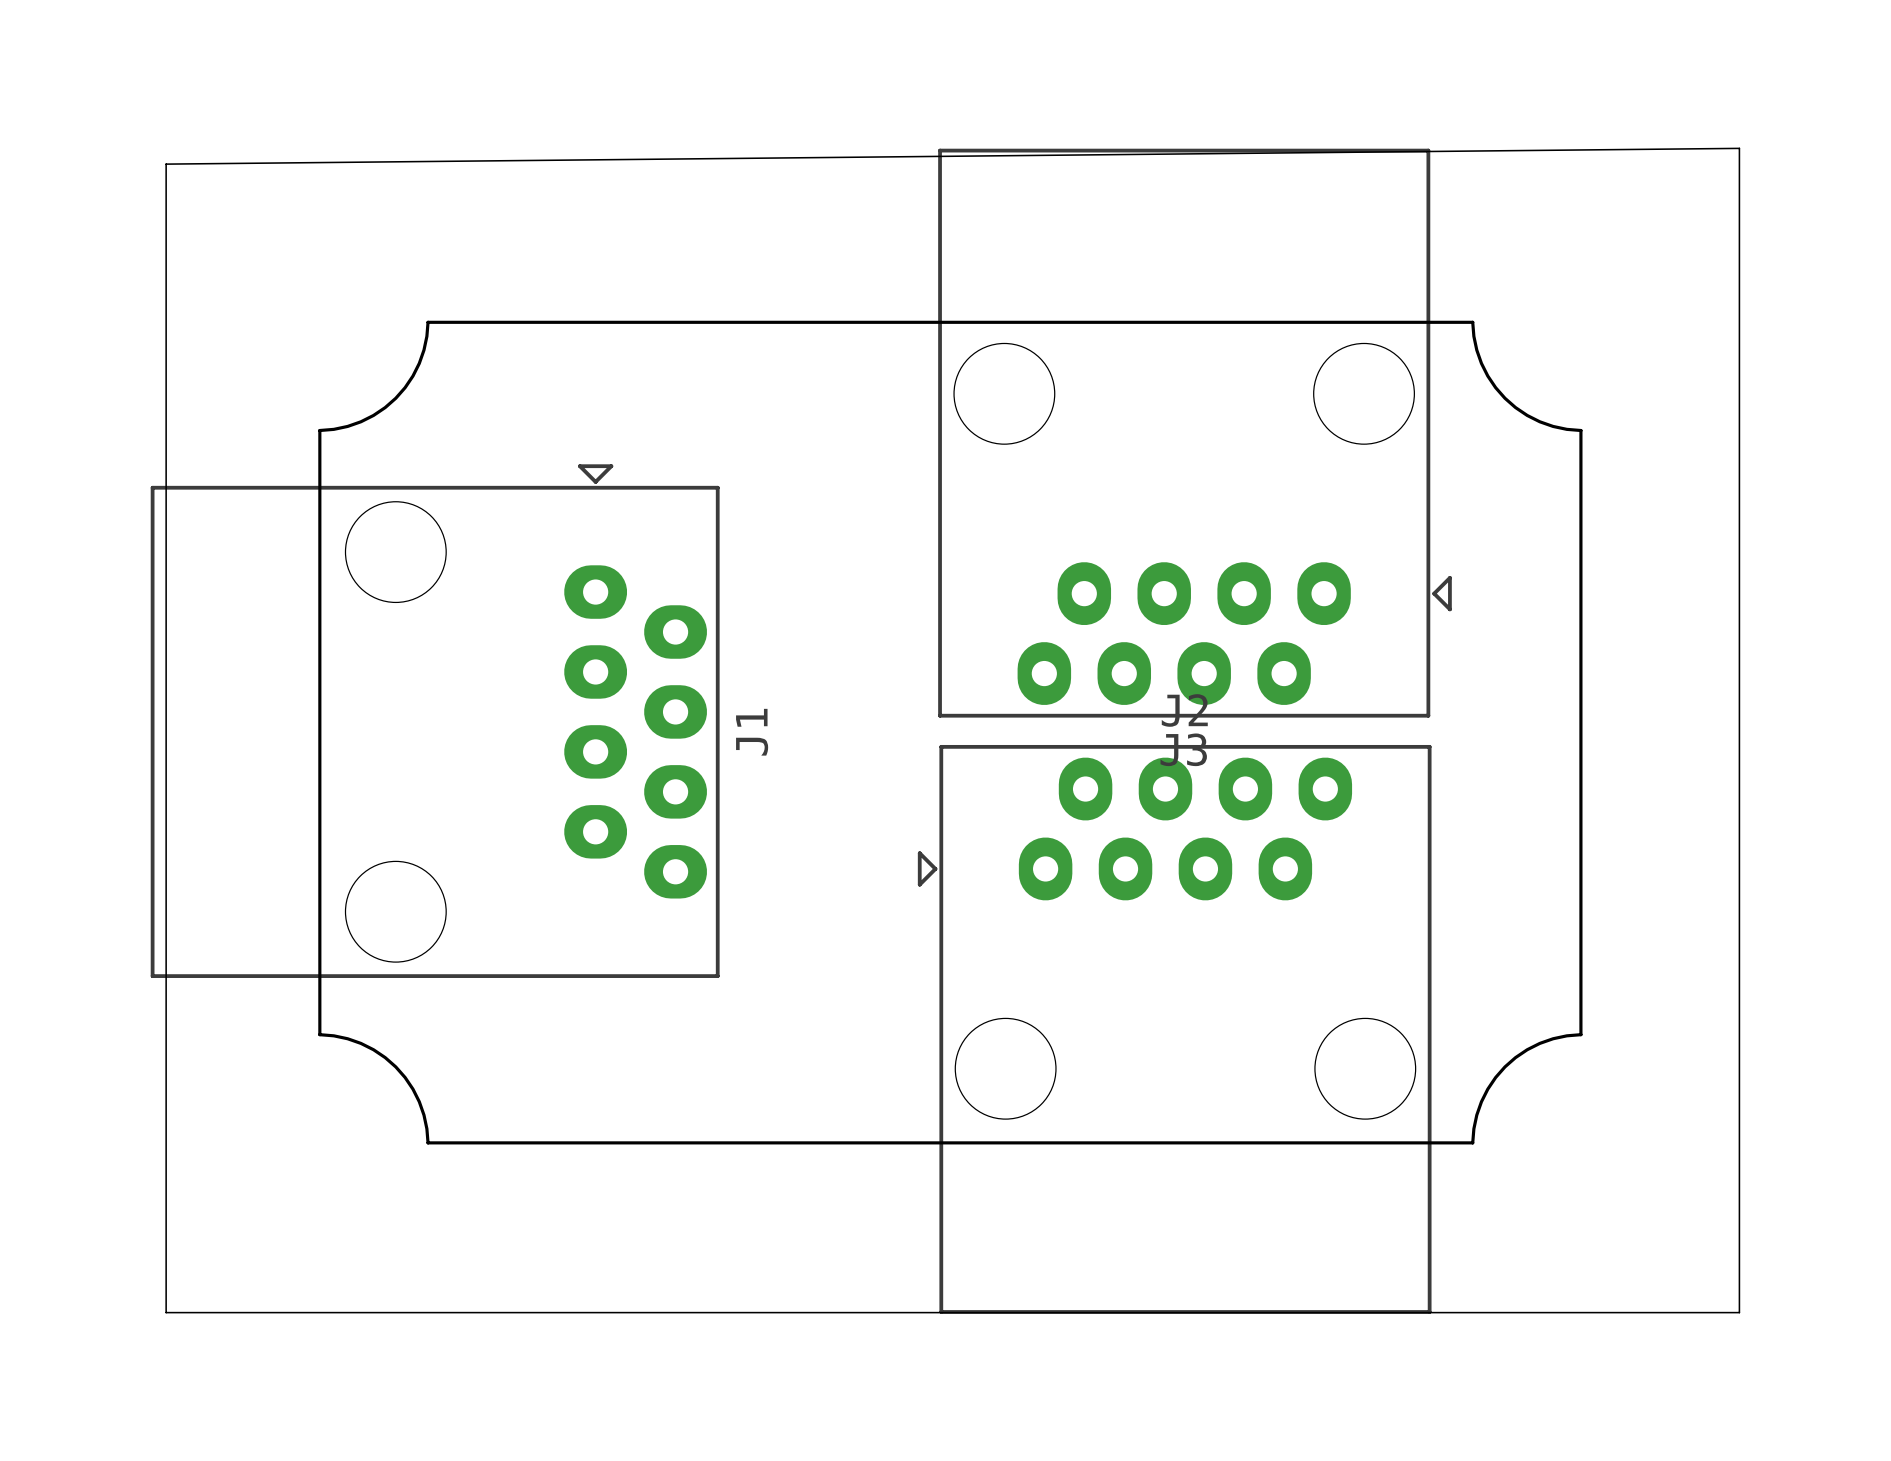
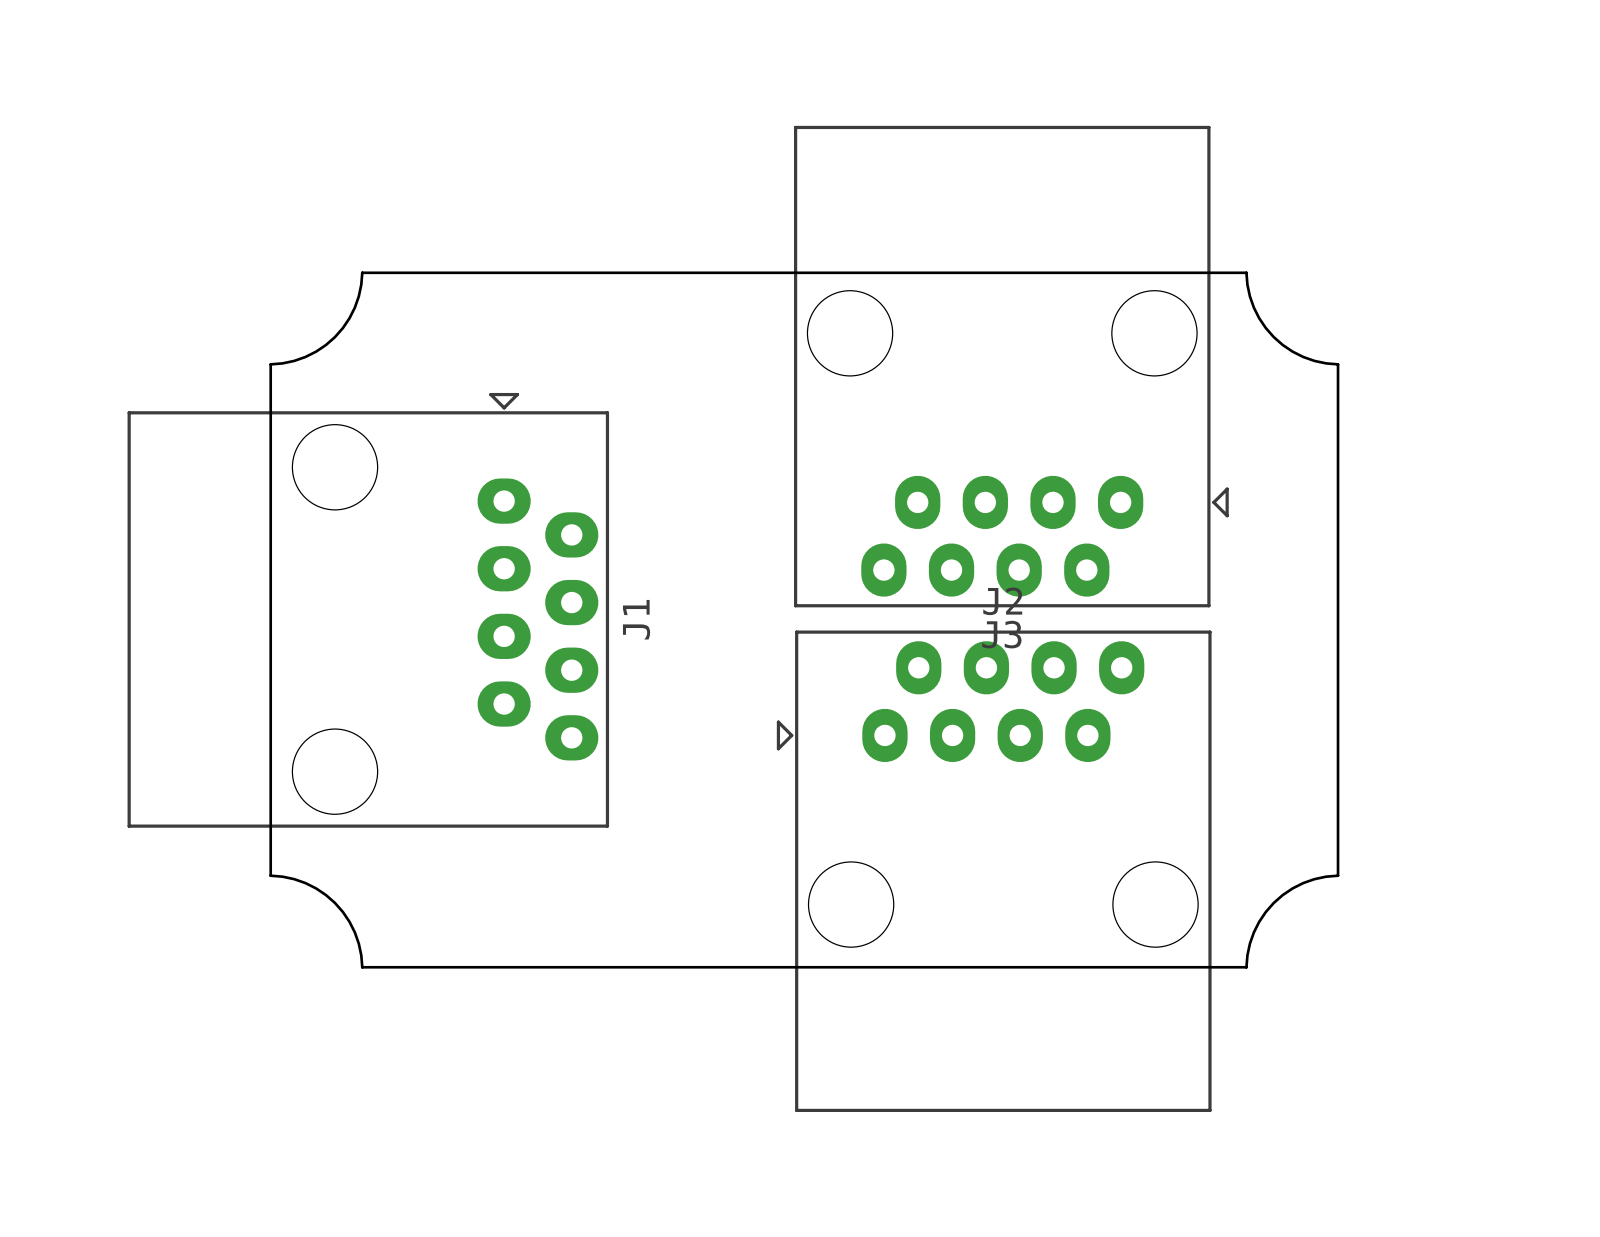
board edge: (1739, 148) (166, 164) (166, 1312) (1739, 1312) (1739, 148) -> none

